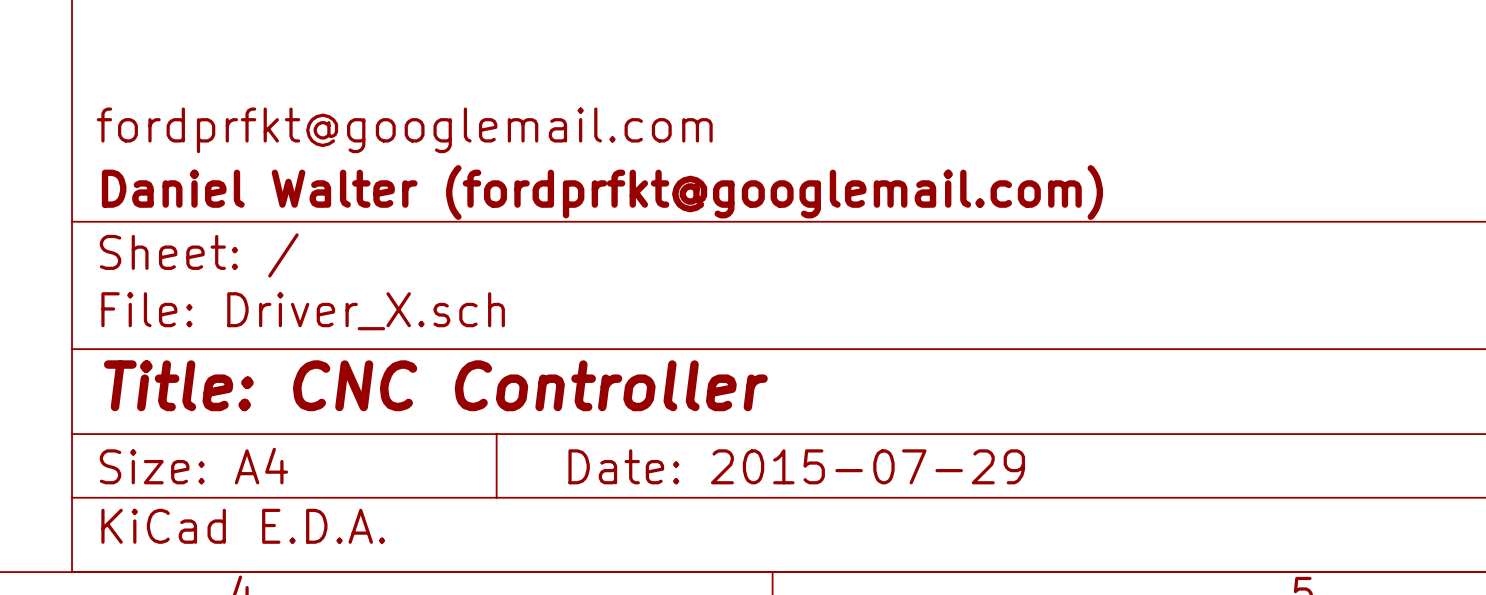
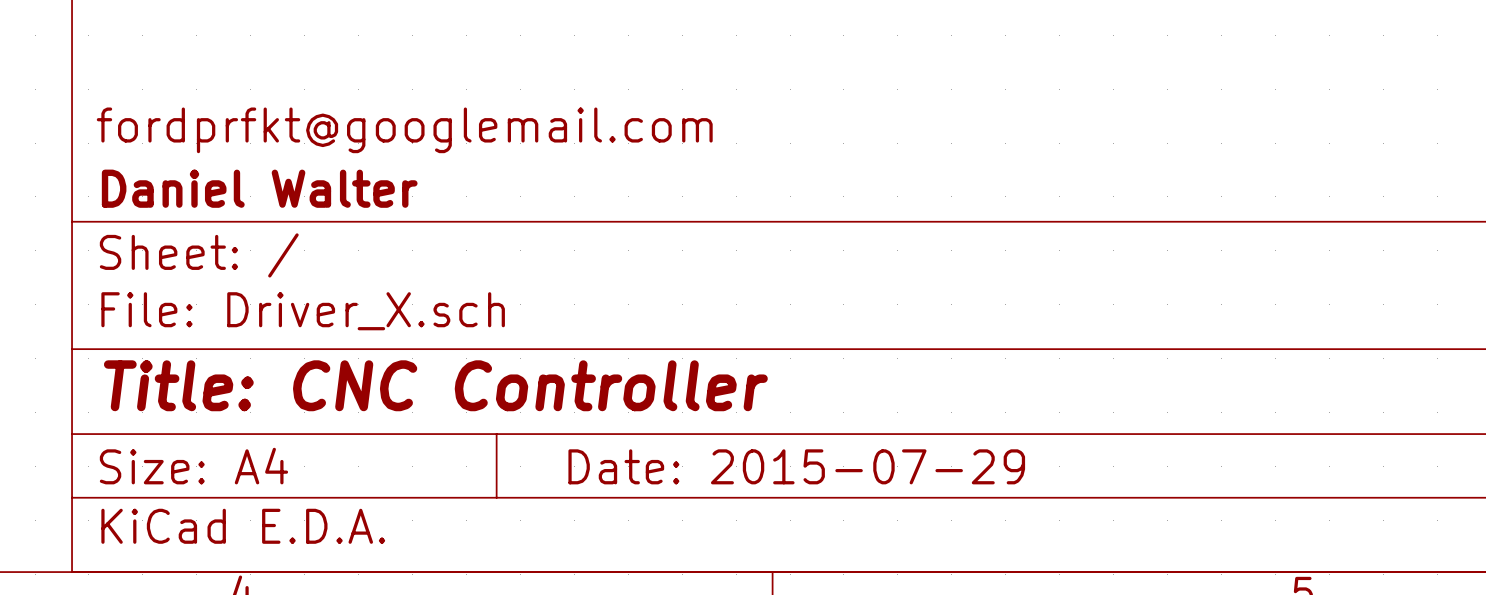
title block: Daniel Walter (fordprfkt@googlemail.com) (602, 192) -> Daniel Walter (259, 188)

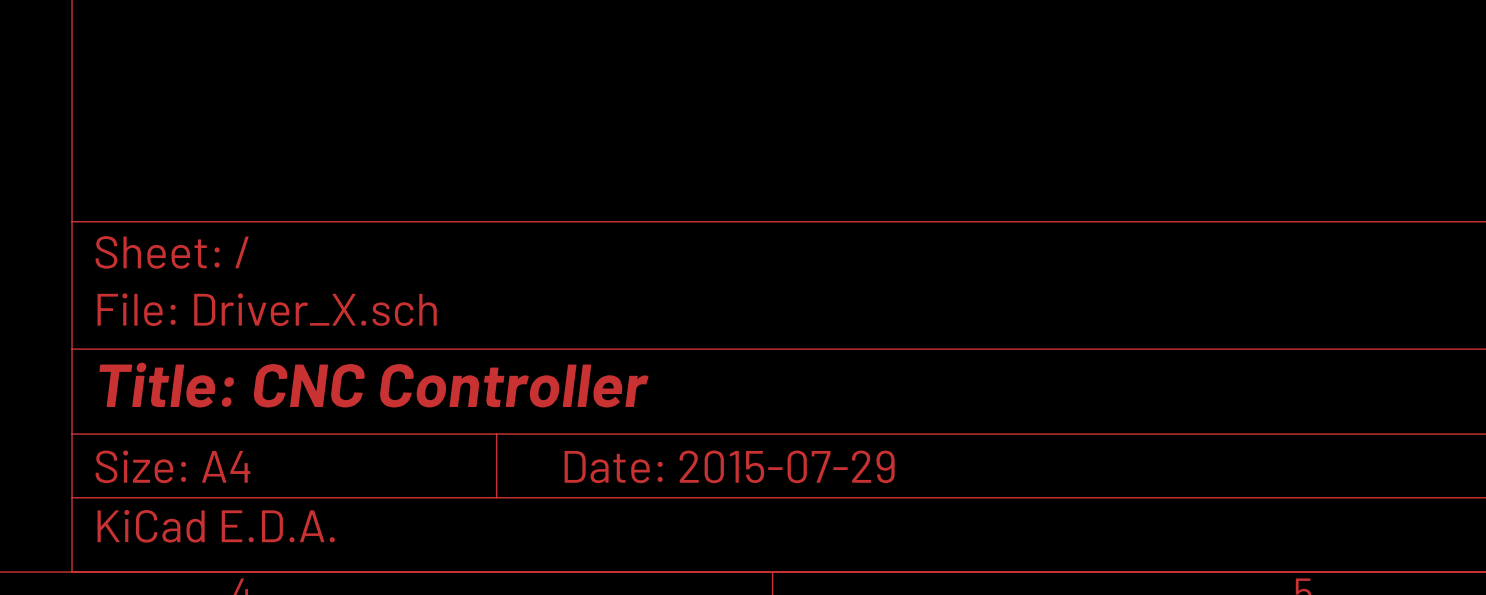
title block: fordprfkt@googlemail.com (404, 130) -> none
title block: Daniel Walter (259, 188) -> none

